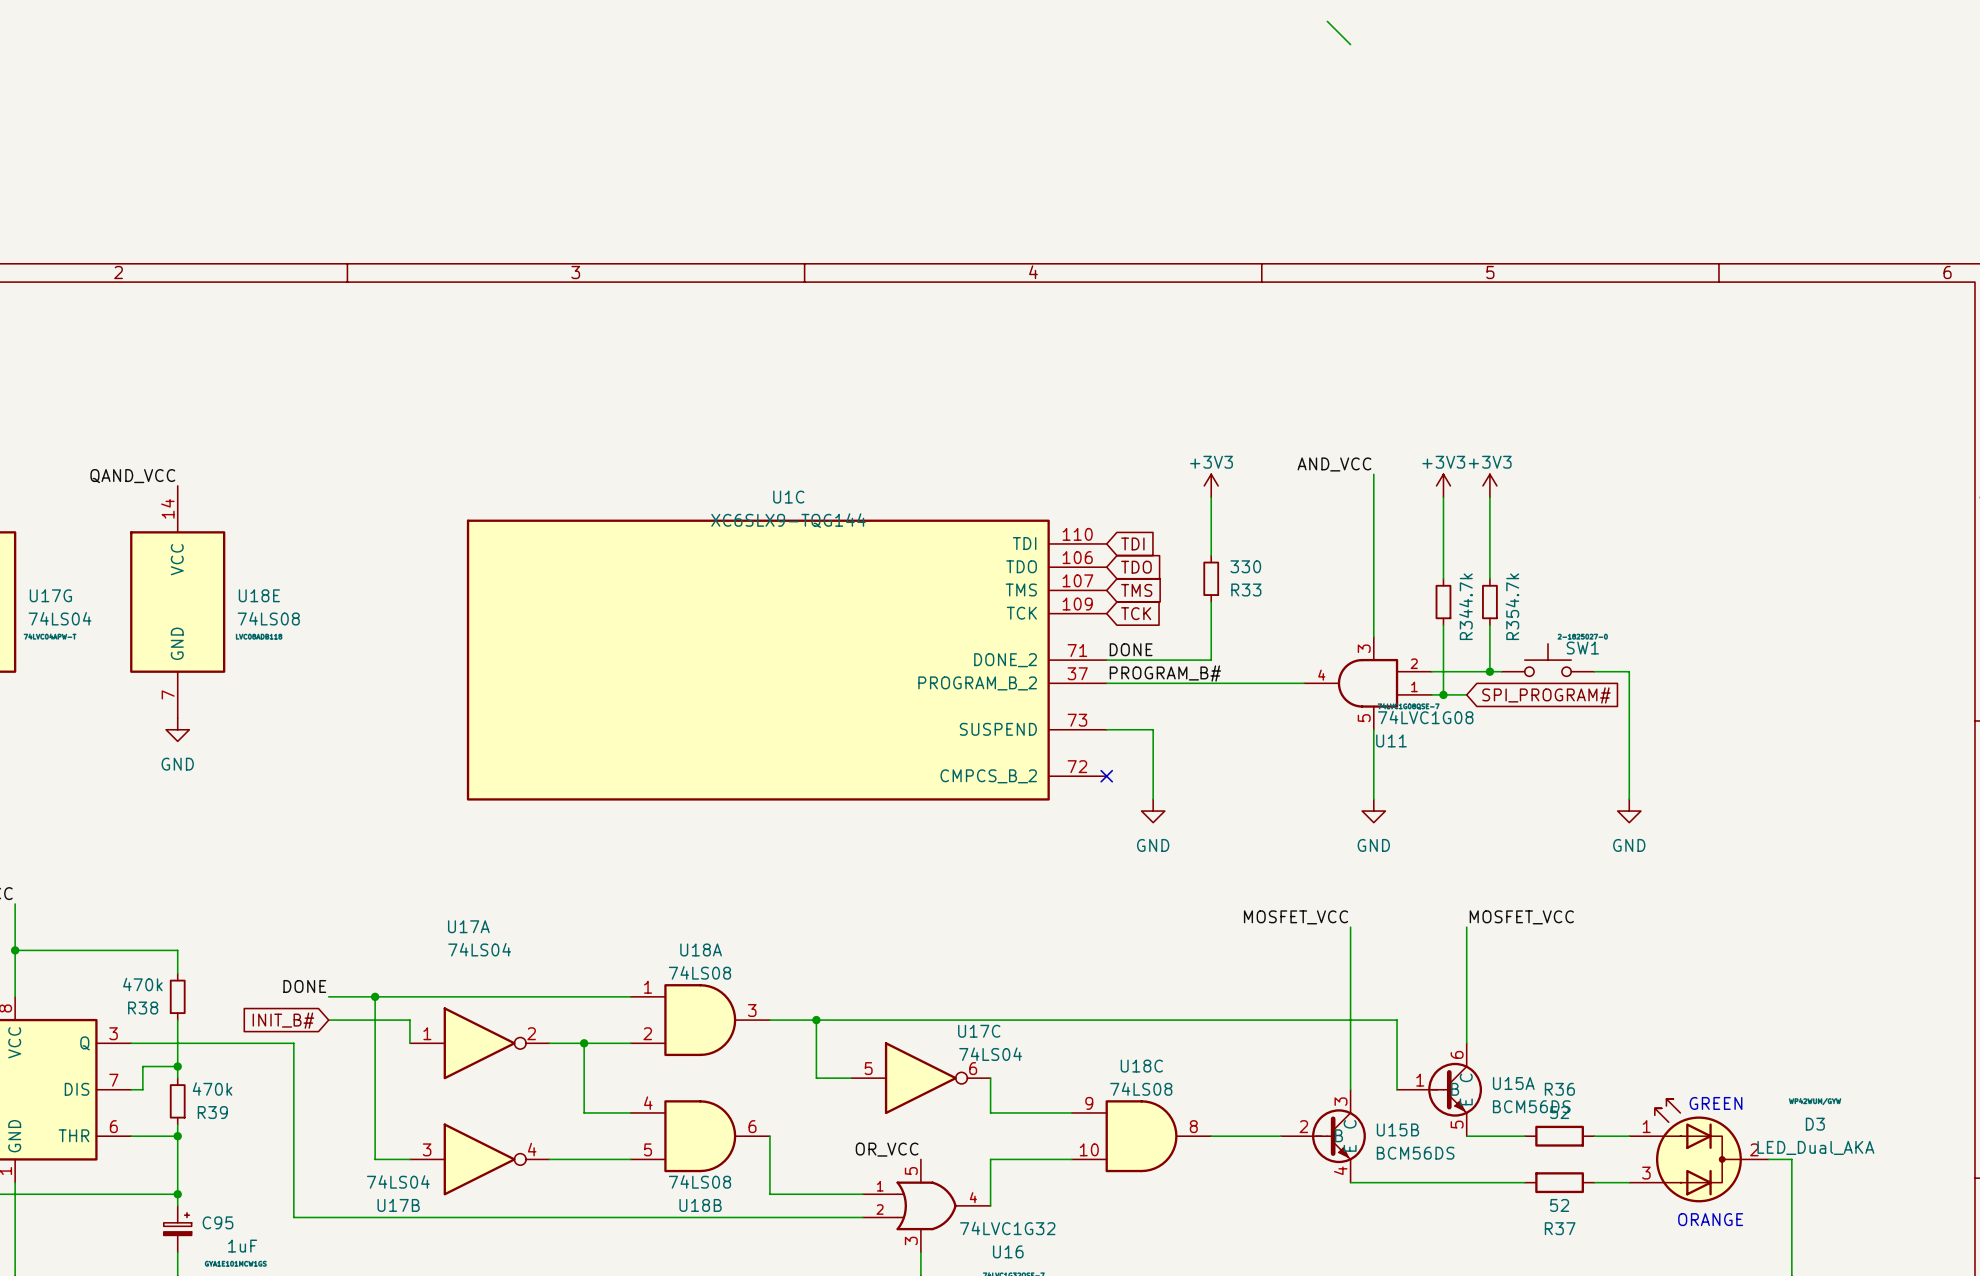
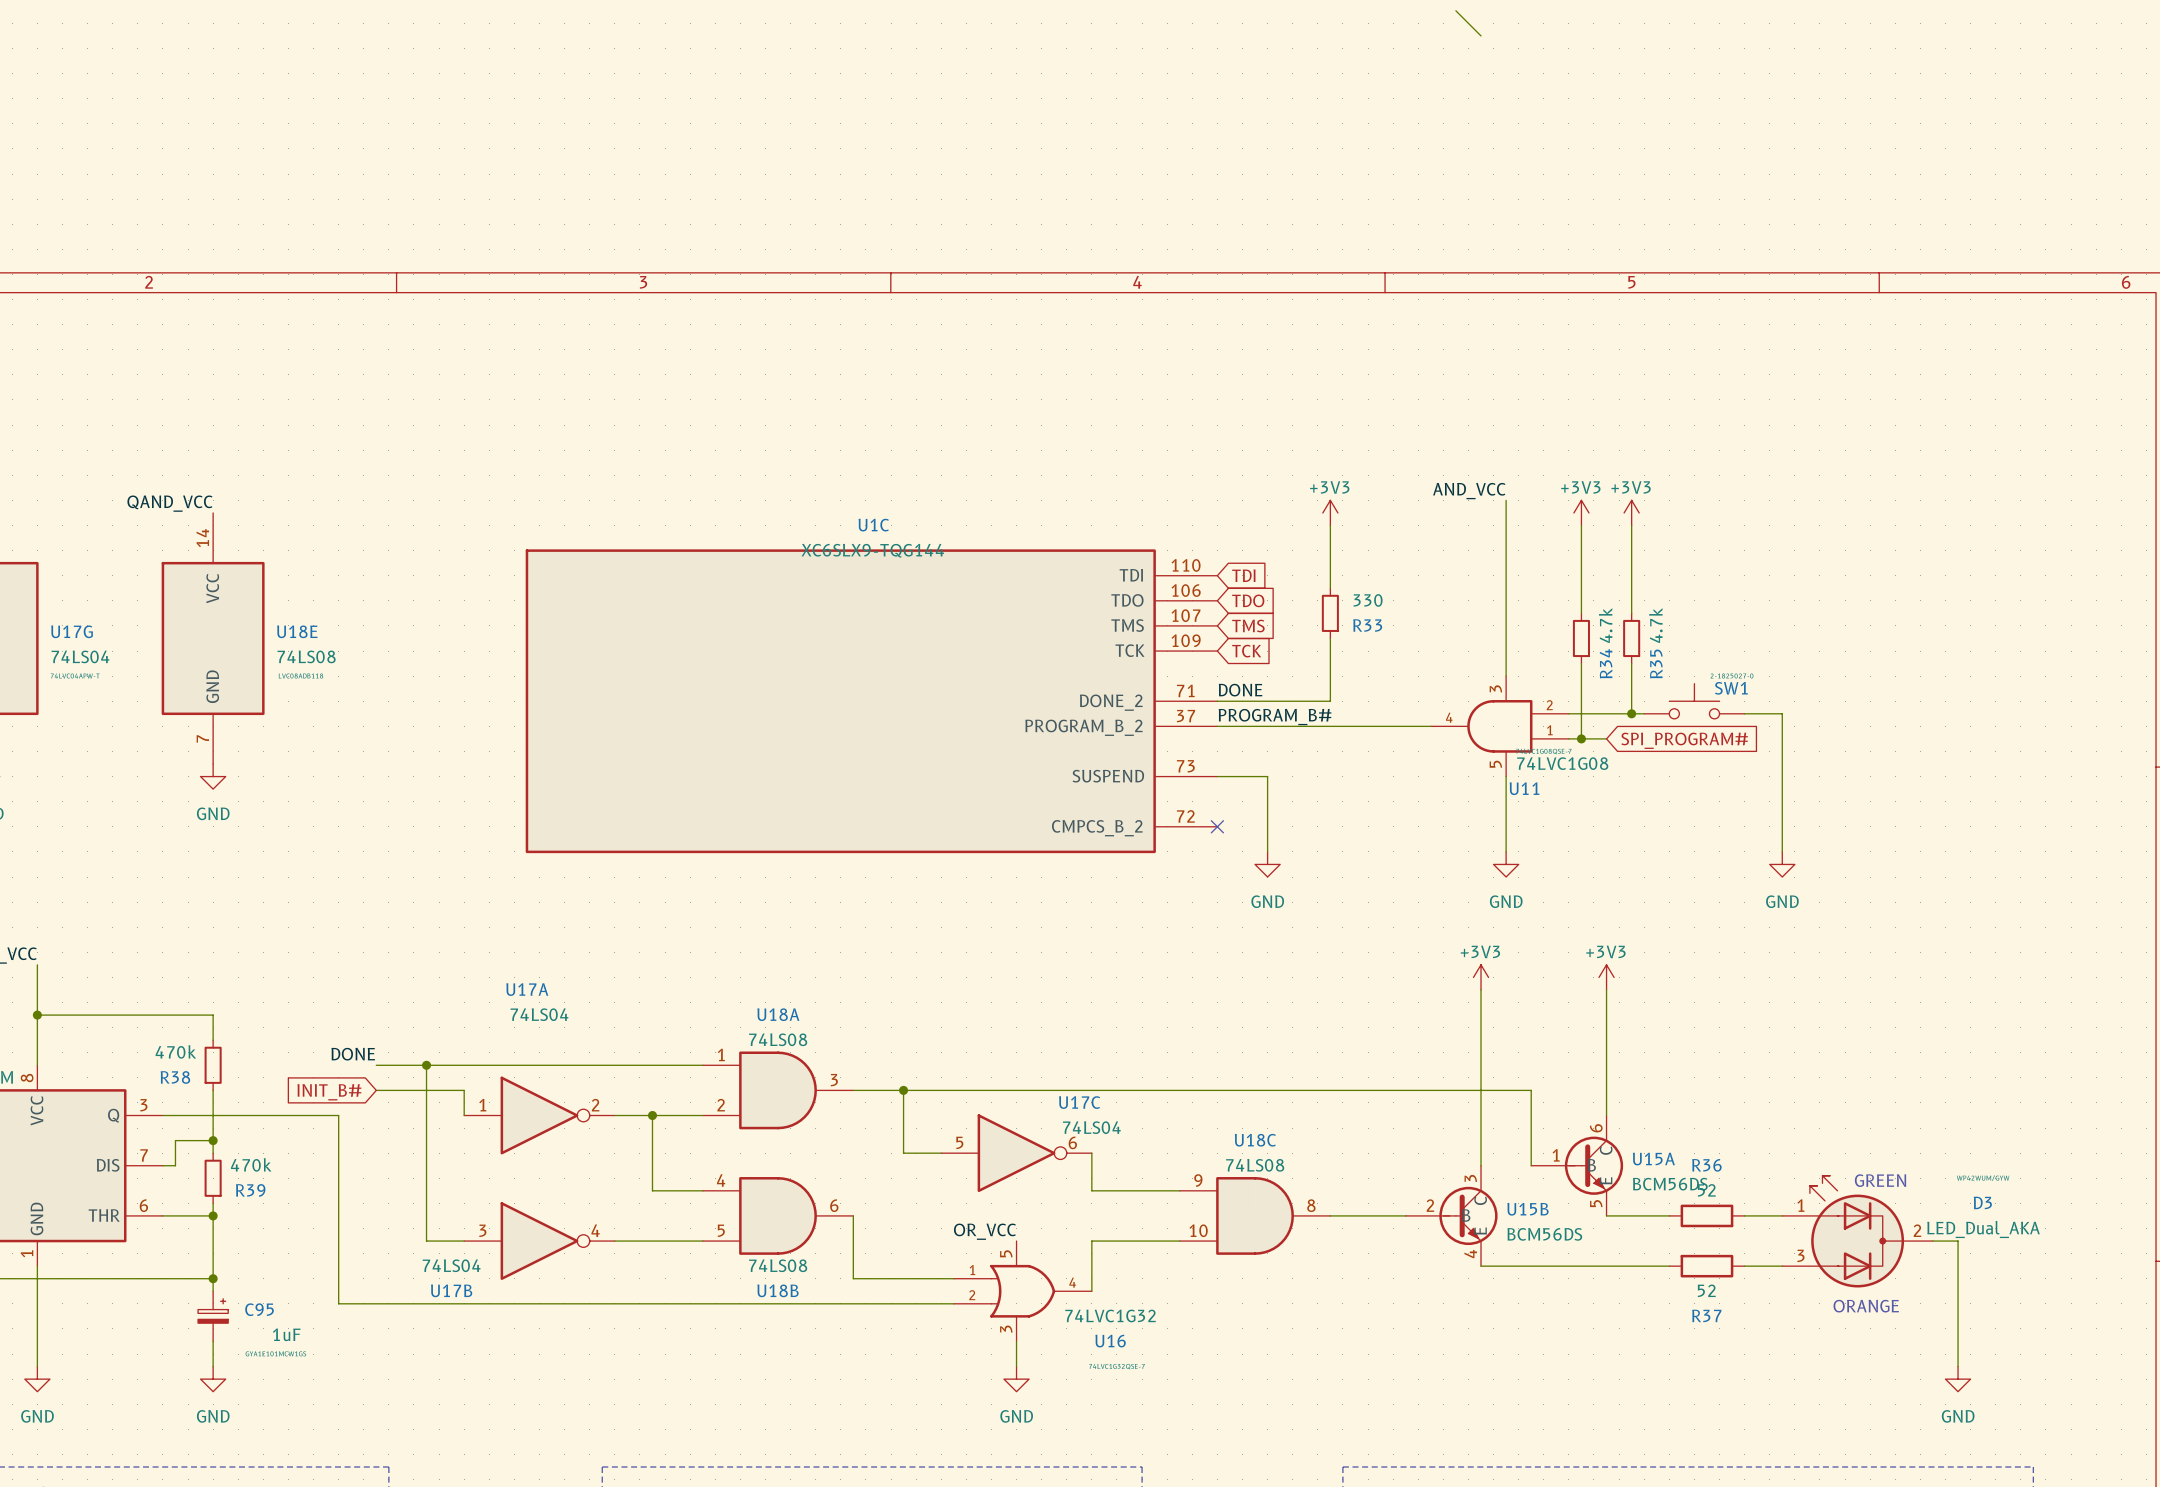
power symbol: none -> +3V3 (1481, 977)
power symbol: none -> +3V3 (1606, 977)
label: MOSFET_VCC (1296, 917) -> none
label: MOSFET_VCC (1521, 917) -> none

